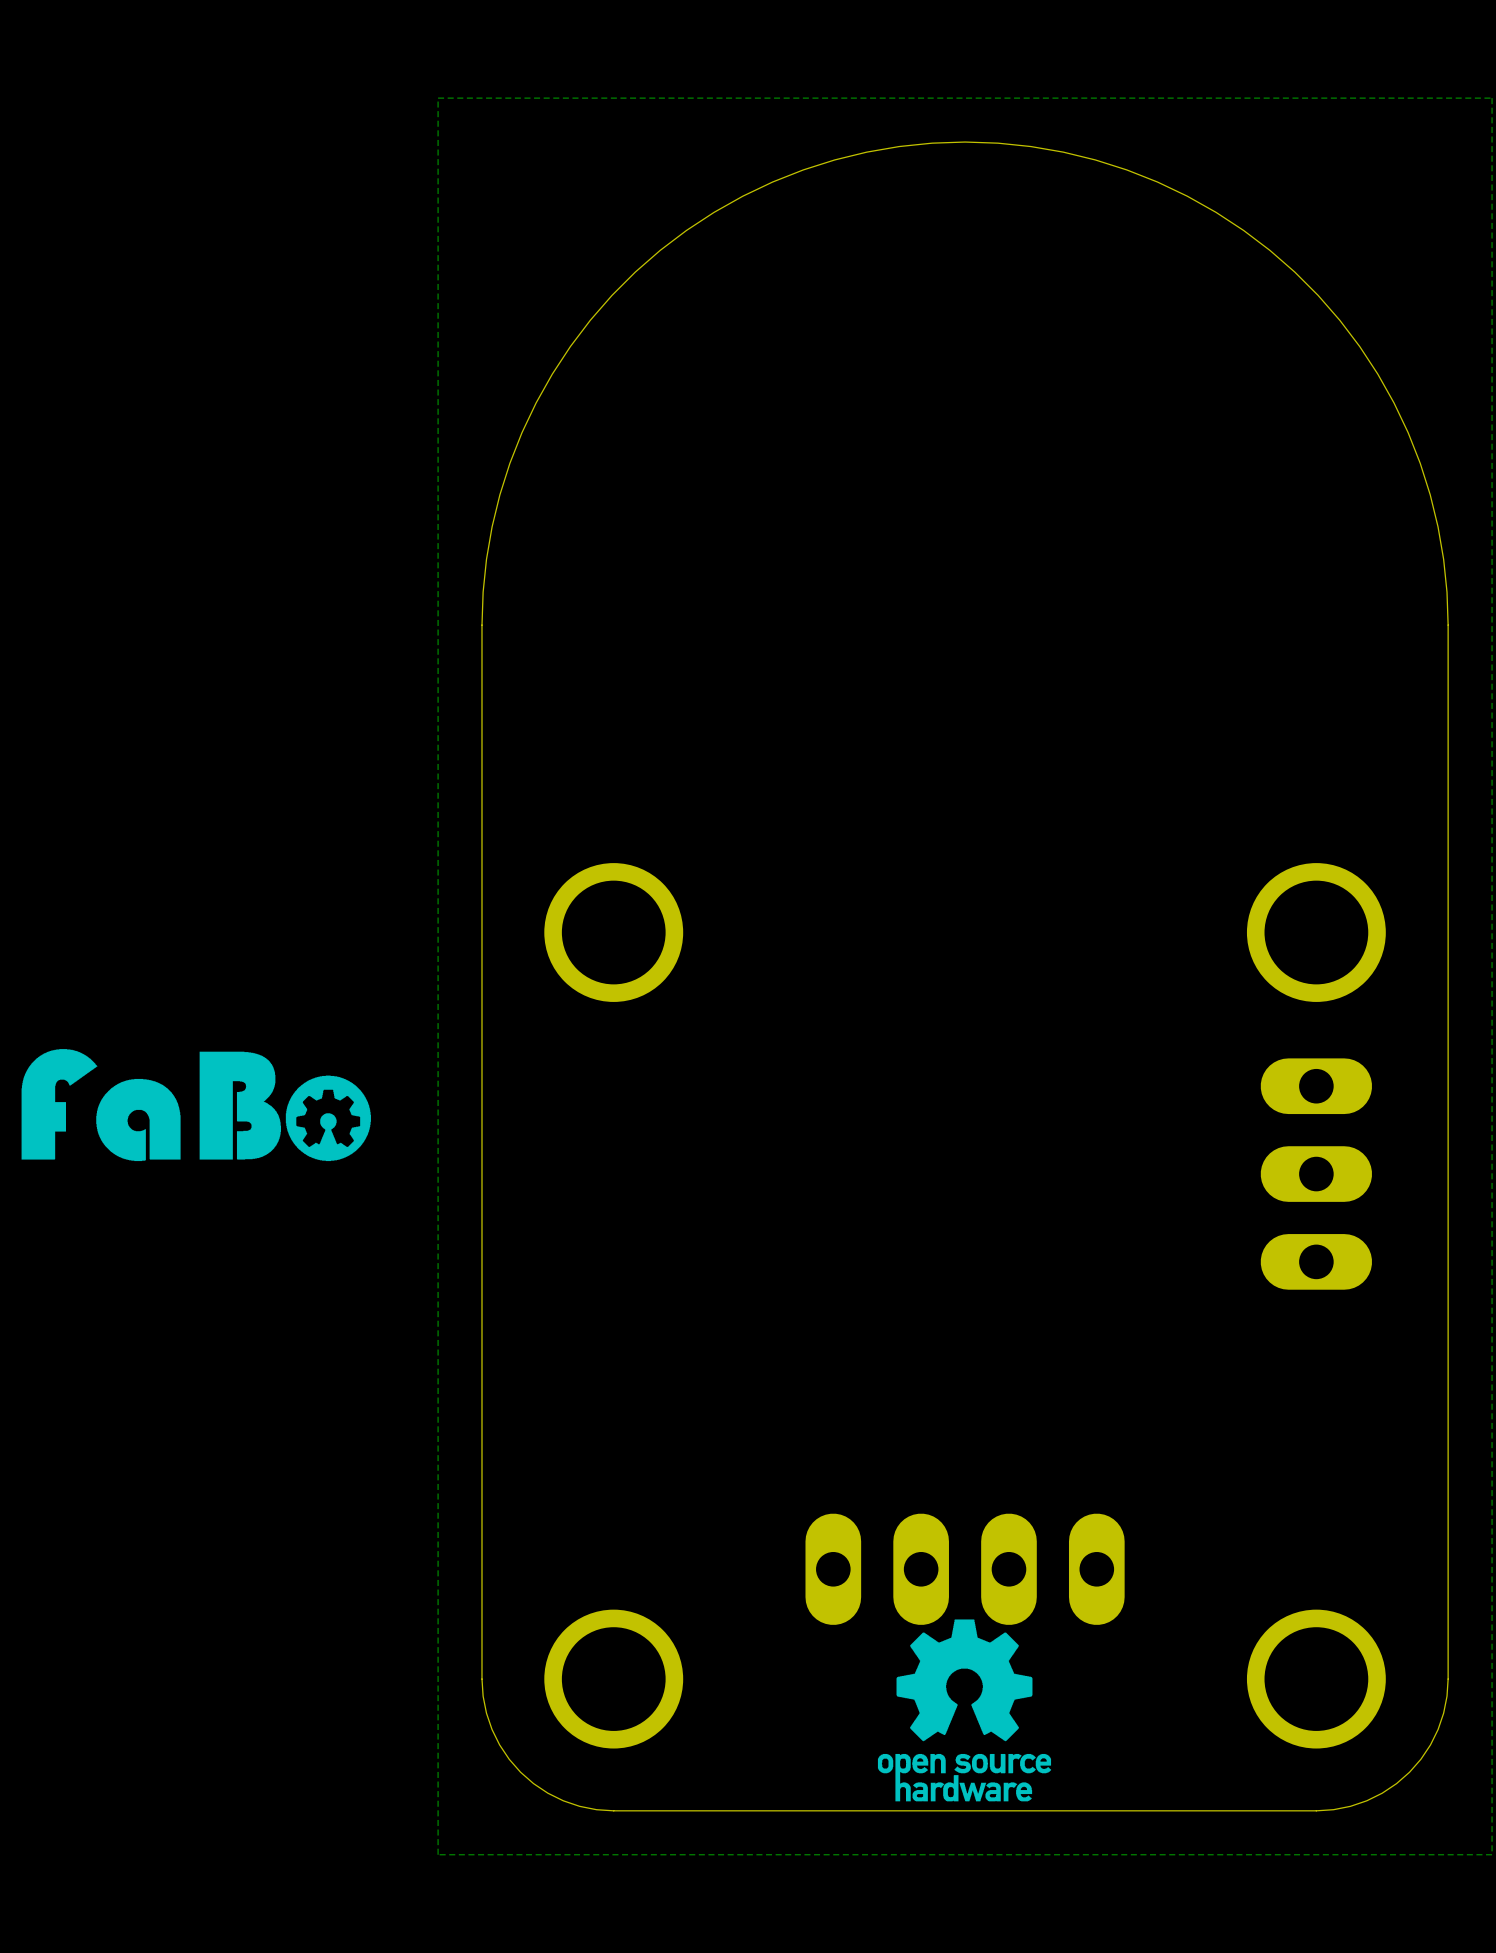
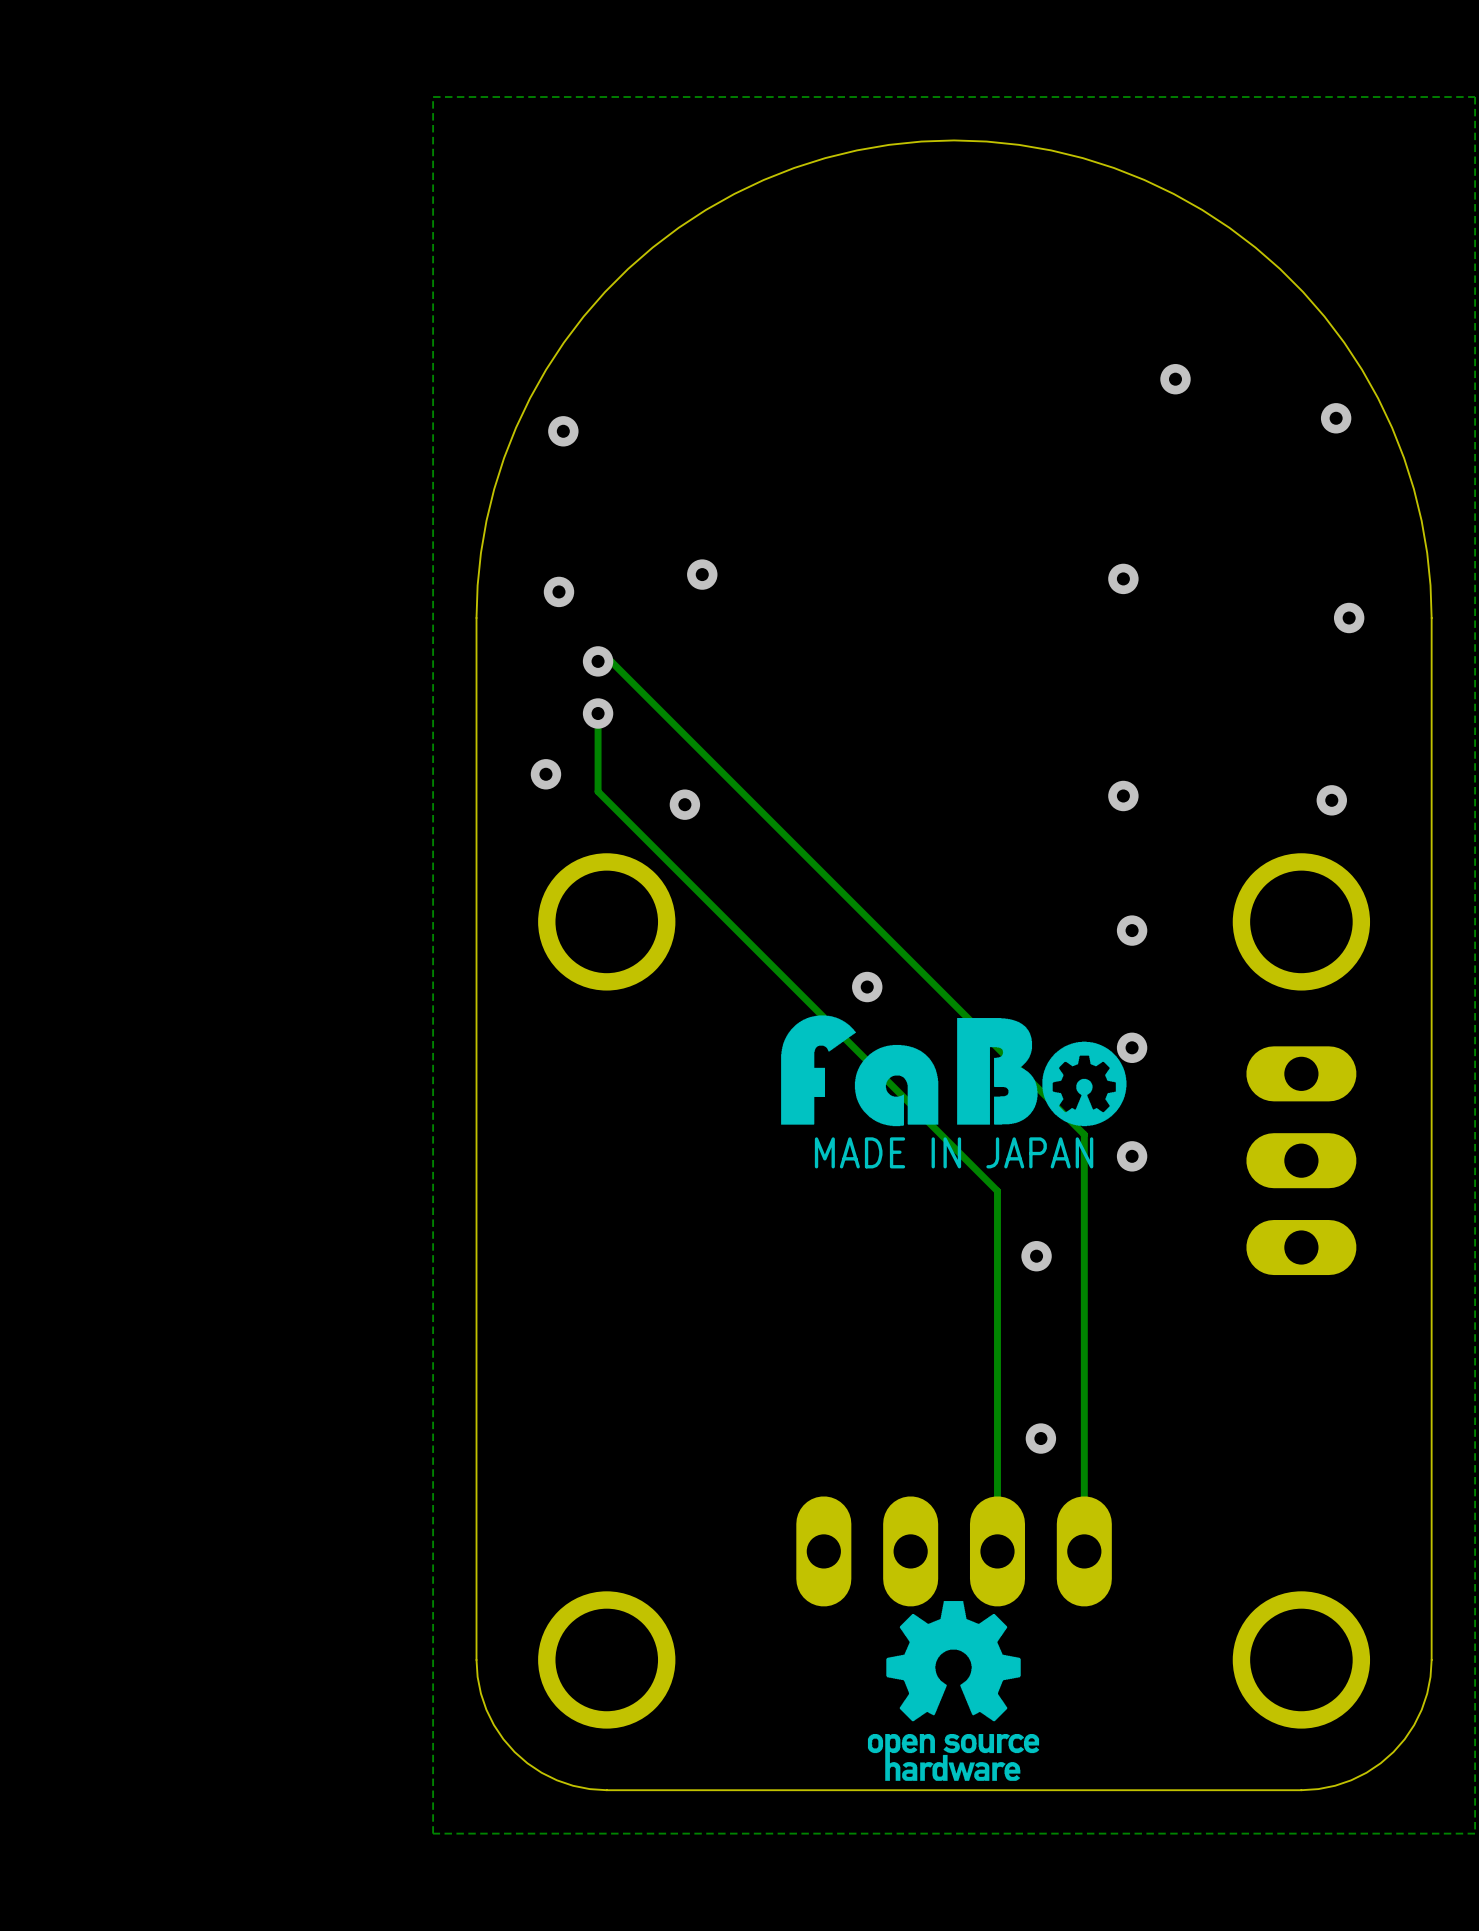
via: none -> (1175, 379)
via: none -> (1336, 418)
via: none -> (563, 431)
via: none -> (702, 574)
via: none -> (1123, 578)
via: none -> (558, 591)
via: none -> (1349, 617)
track: none -> (598, 661) (611, 661) (1084, 1134) (1084, 1551)
via: none -> (598, 661)
track: none -> (598, 713) (598, 791) (997, 1191) (997, 1551)
via: none -> (598, 713)
via: none -> (545, 774)
via: none -> (1123, 795)
via: none -> (1331, 800)
via: none -> (684, 804)
via: none -> (1132, 930)
via: none -> (867, 987)
via: none -> (1132, 1047)
drawing position: (196, 1105) -> (953, 1070)
text: none -> MADE IN JAPAN (954, 1152)
via: none -> (1132, 1156)
via: none -> (1036, 1256)
via: none -> (1040, 1438)

